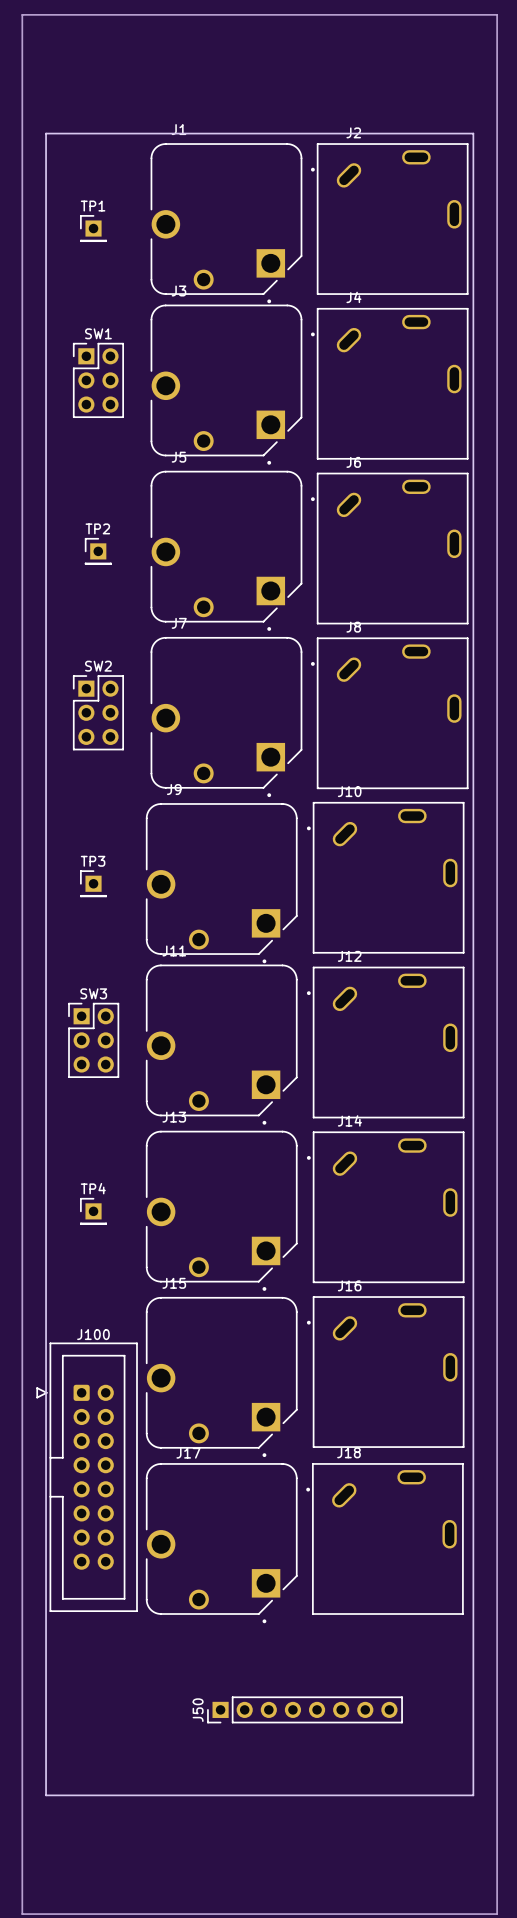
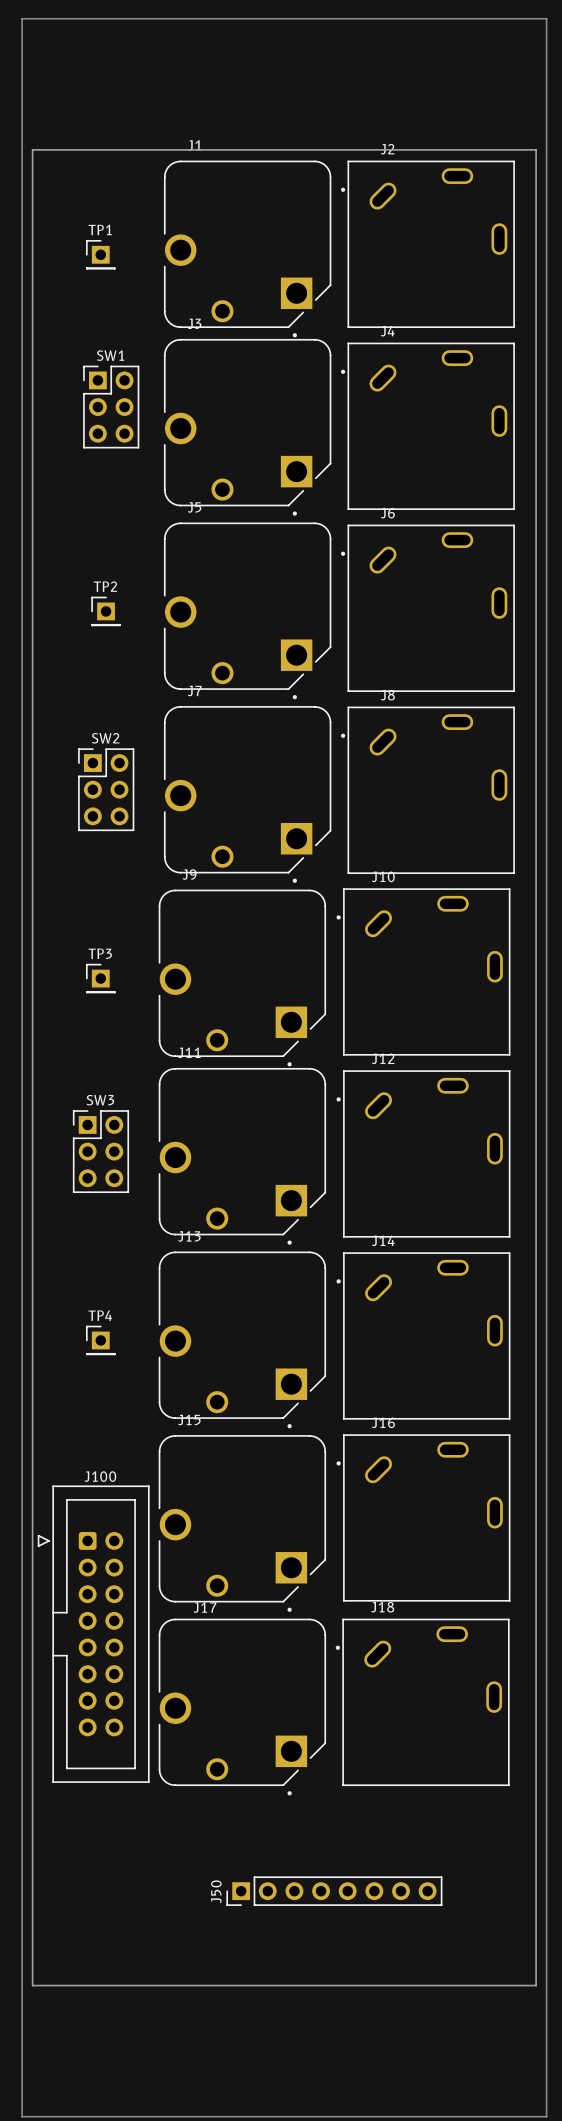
board edge: (46, 133) (46, 1795) -> (48, 149) (32, 149) (32, 1985) (48, 1985)
board edge: (473, 133) (473, 1795) -> (520, 149) (536, 149) (536, 1985) (520, 1985)
SW1 position: (98, 380) -> (111, 407)

